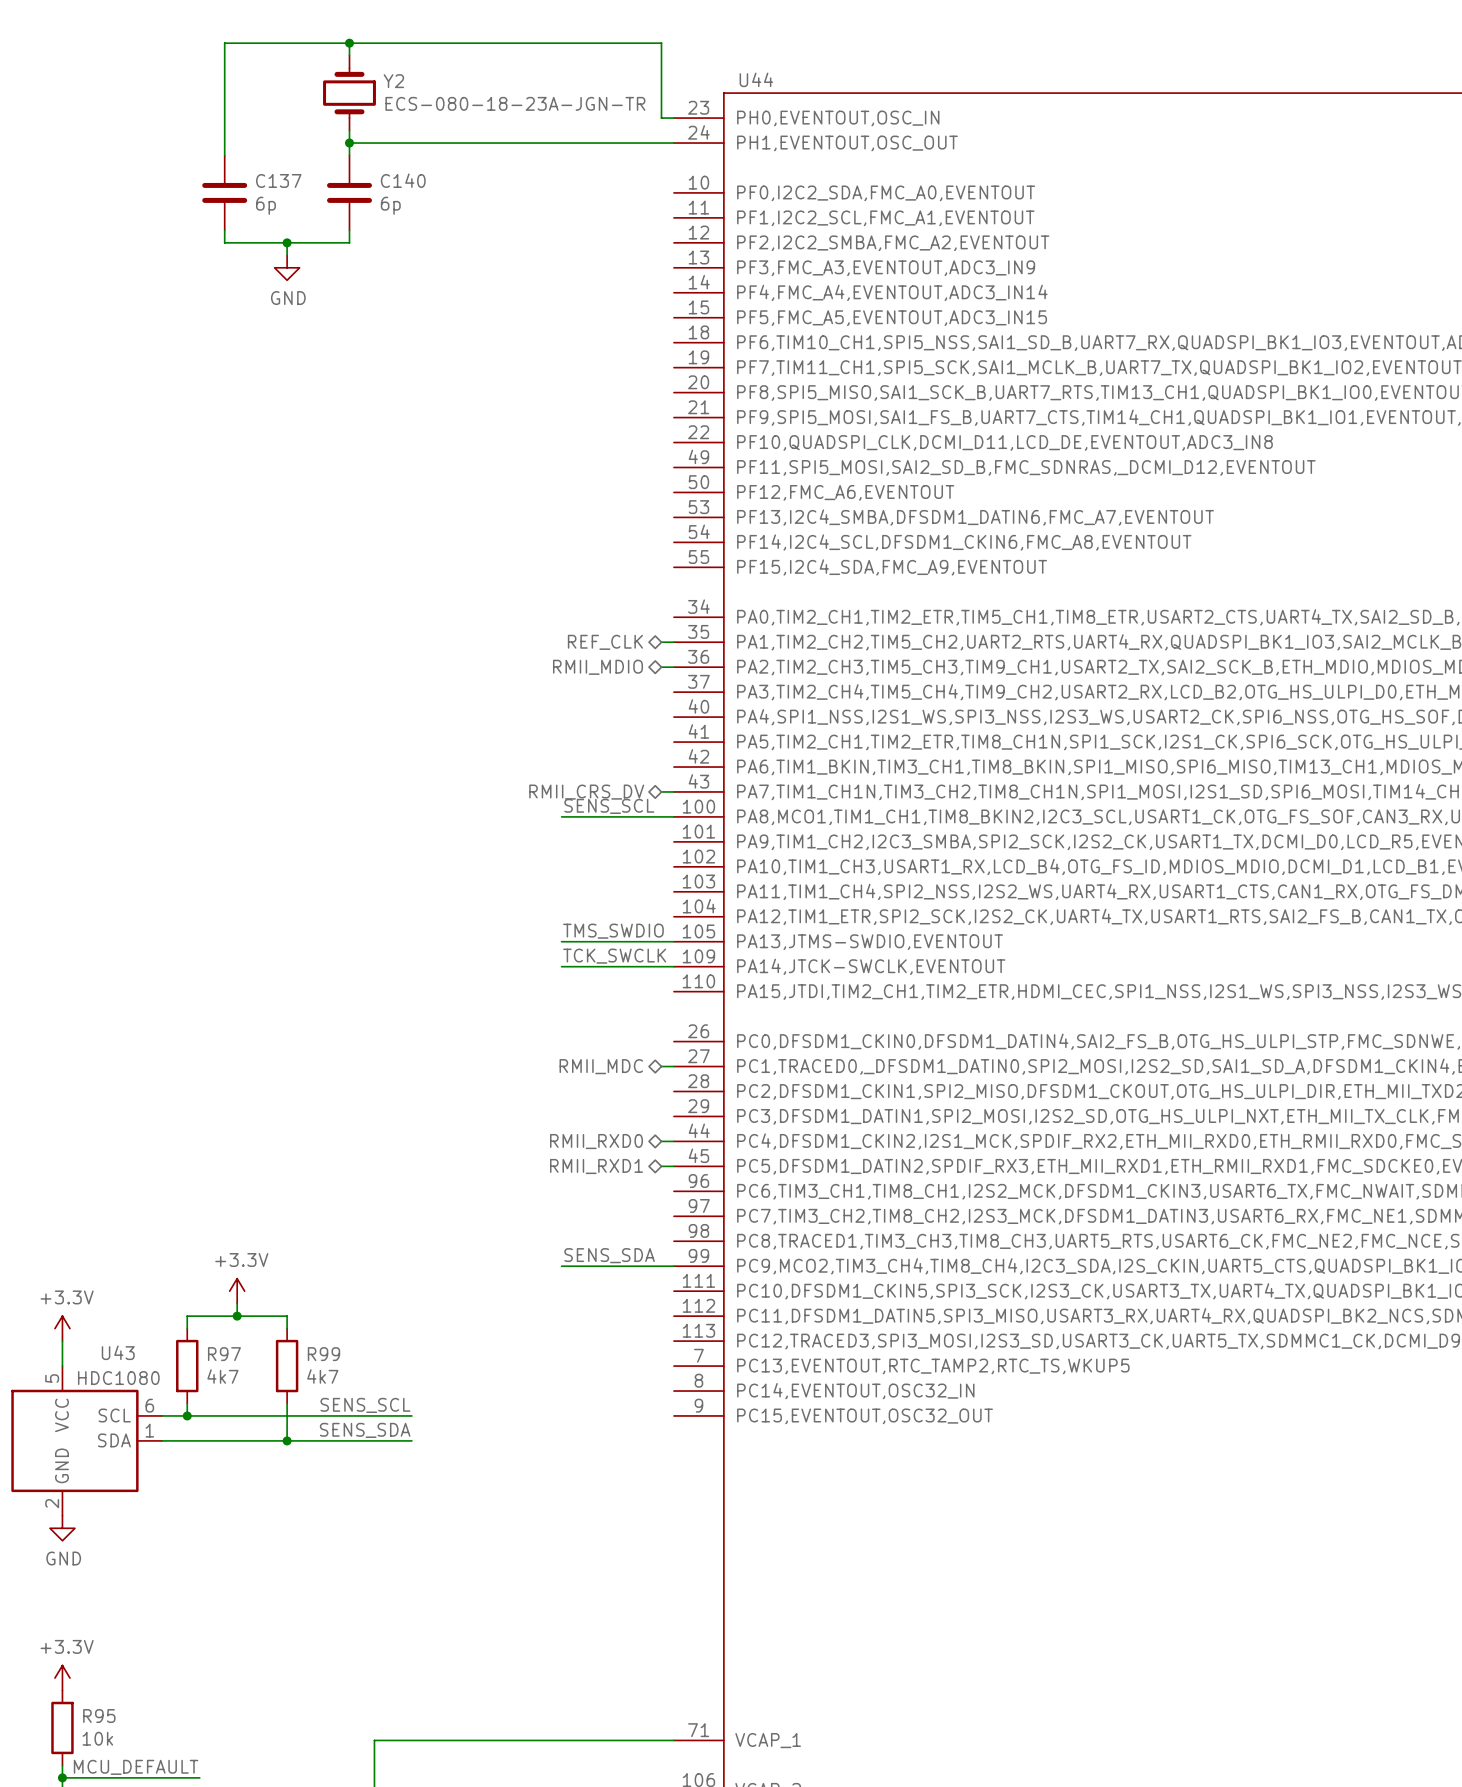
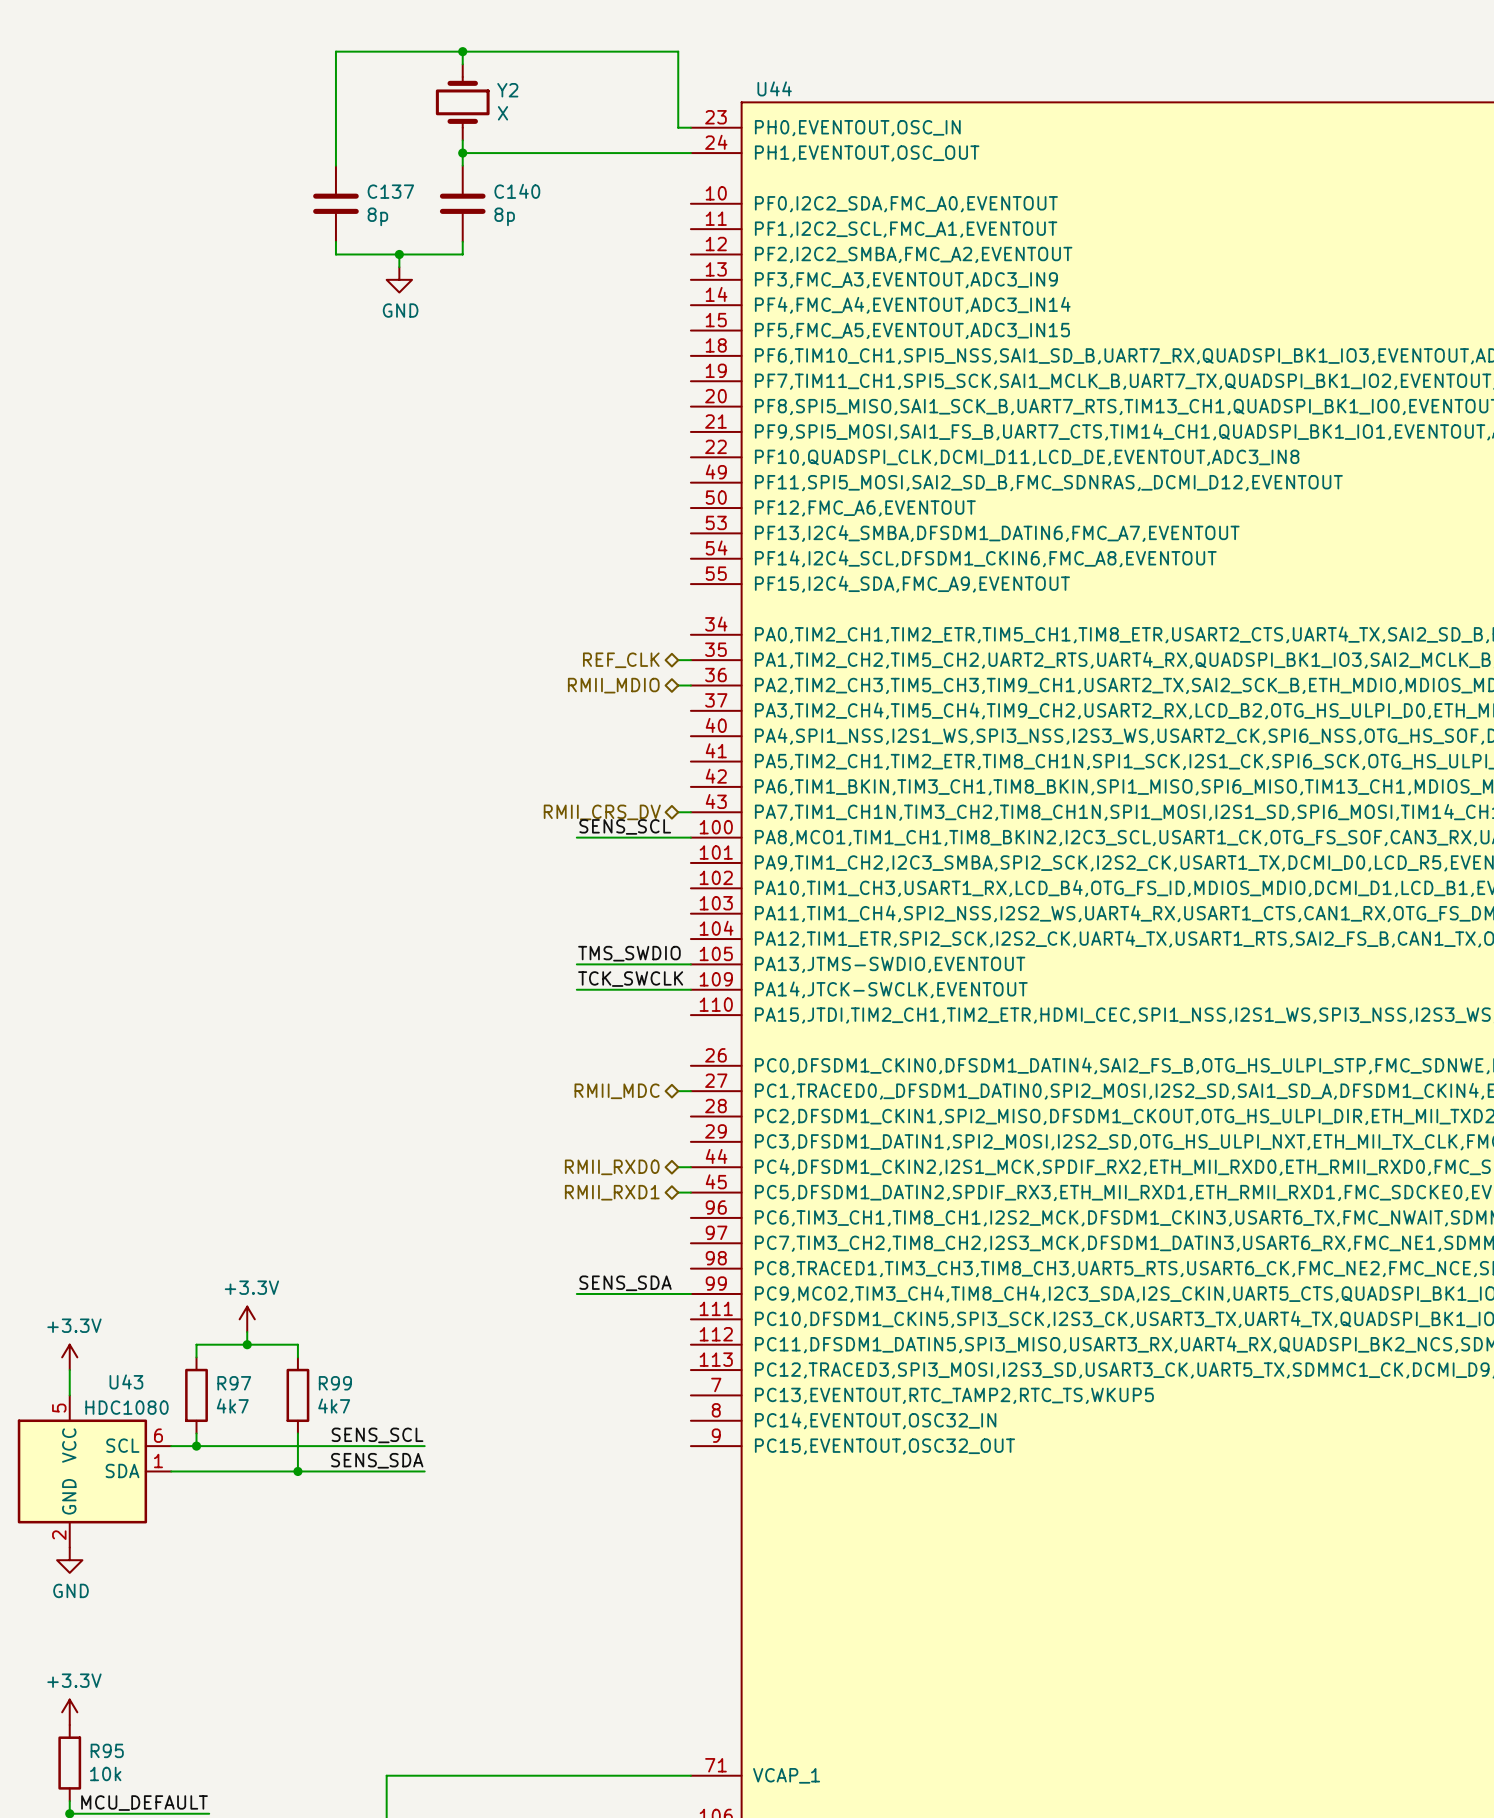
wire: (324, 43) (224, 43) (224, 155) -> (335, 51) (335, 165)
wire: (349, 43) (349, 55) -> (462, 51) (462, 64)
junction: (349, 43) -> none
junction: none -> (462, 51)
Y2 position: (349, 93) -> (462, 102)
Y2 value: ECS-080-18-23A-JGN-TR (515, 103) -> X (502, 113)
wire: (349, 130) (349, 155) -> (462, 140) (462, 165)
wire: (349, 143) (449, 143) -> none
junction: (349, 143) -> none
junction: none -> (462, 153)
C137 position: (224, 192) -> (335, 203)
C140 position: (349, 192) -> (462, 203)
C137 value: 6p (265, 205) -> 8p (377, 216)
C140 value: 6p (390, 205) -> 8p (504, 216)
wire: (224, 230) (224, 242) (324, 242) -> (335, 241) (335, 254)
wire: (349, 230) (349, 242) -> (462, 241) (462, 254) (361, 254)
wire: (287, 242) (287, 255) -> (399, 254) (399, 267)
junction: (287, 242) -> none
junction: none -> (399, 254)
power symbol position: GND (287, 267) -> GND (399, 279)

